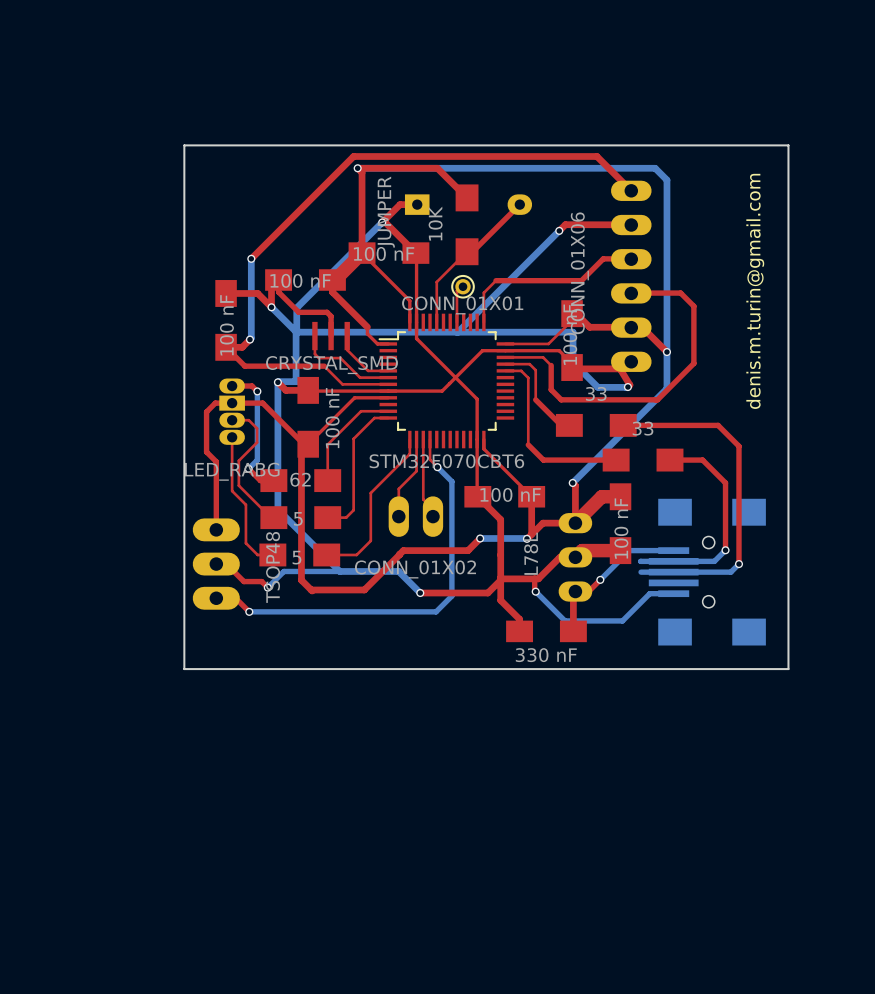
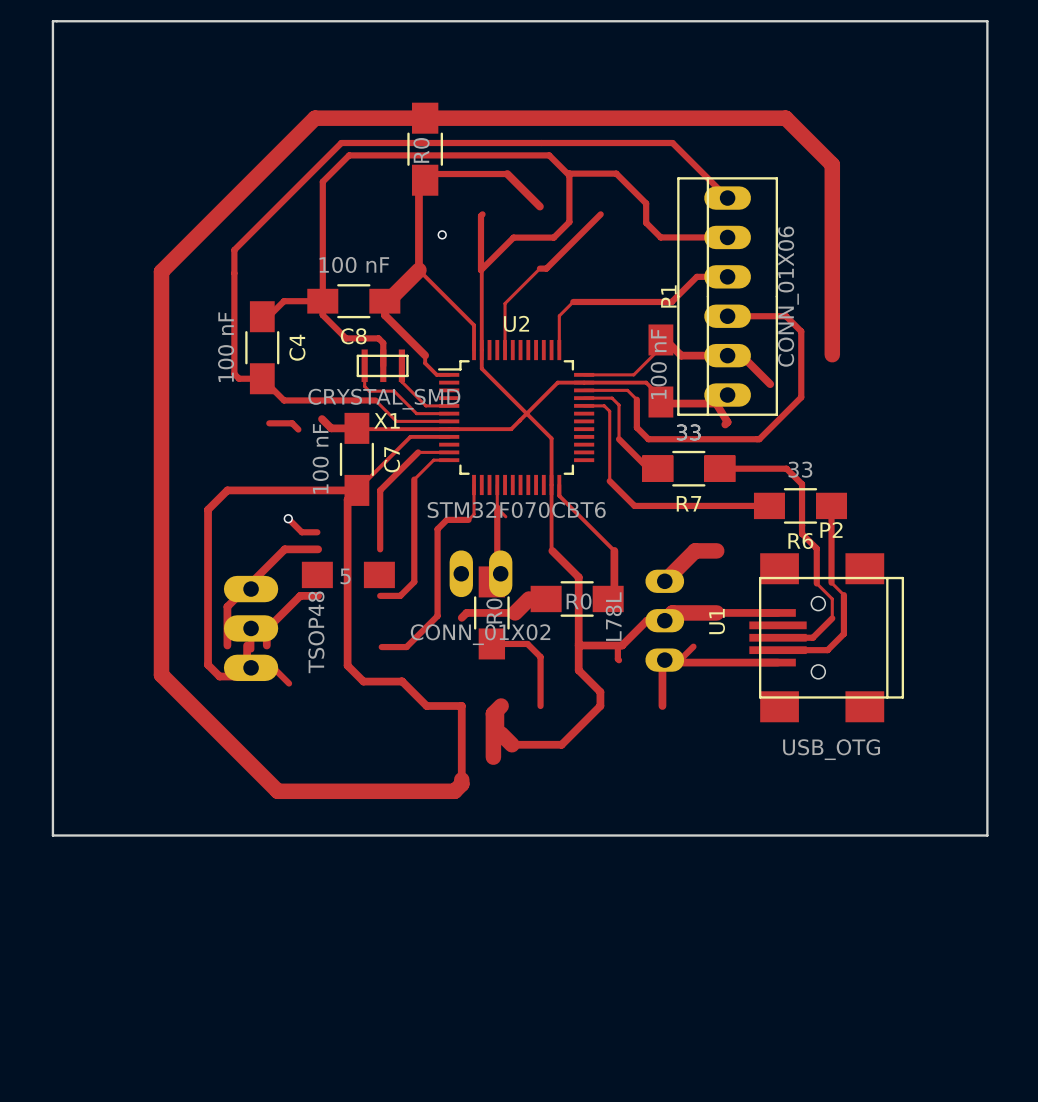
board edge: (184, 145) (184, 669) (788, 669) (788, 145) (184, 145) -> (52, 21) (52, 835) (987, 835) (987, 21) (52, 21)
part: none -> R0 (425, 149)
bottom track: (357, 168) (655, 168) (666, 180) (666, 388) (572, 482) -> none
via: (357, 168) -> none
top track: (438, 169) (357, 168) (362, 172) (362, 184) -> (507, 174) (436, 174) (418, 191)
top track: none -> (569, 175) (549, 155) (349, 155) (322, 181) (322, 312)
top track: (629, 190) (596, 156) (353, 156) (251, 258) -> (727, 198) (672, 143) (341, 143) (234, 250) (234, 374) (239, 378) (262, 378)
top track: (423, 204) (400, 204) (382, 222) (385, 222) (415, 253) -> none
part: JUMPER (468, 204) -> none
top track: none -> (480, 215) (480, 270) (513, 237) (553, 237) (569, 222) (569, 173) (616, 173) (646, 203) (646, 222) (660, 237) (727, 237)
bottom track: (382, 222) (296, 307) (296, 332) -> none
part: 10K (467, 224) -> none
top track: (617, 224) (565, 224) (559, 230) -> none
bottom track: (559, 230) (457, 332) -> none
via: (559, 230) -> none
part: 100 nF (388, 253) -> none
bottom track: (251, 258) (249, 339) -> none
via: (251, 258) -> none
P1: none -> CONN_01X06 (727, 296)
part: CONN_01X06 (631, 276) -> none
top track: (278, 280) (271, 287) (271, 307) (257, 293) (226, 293) -> (322, 301) (284, 301) (268, 316)
part: 100 nF (305, 280) -> none
C8: none -> 100 nF (353, 301)
top track: (463, 284) (456, 290) (456, 322) -> none
part: CONN_01X01 (463, 286) -> none
text: denis.m.turin@gmail.com (755, 291) -> none
U2 name: none -> U2 (516, 323)
bottom track: (271, 307) (296, 331) (296, 381) (277, 382) (277, 509) (339, 571) -> none
via: (271, 307) -> none
part: 100 nF (226, 320) -> none
C4: none -> 100 nF (262, 347)
top track: none -> (832, 354) (832, 164) (785, 118) (315, 118) (161, 271) (161, 674) (277, 791) (454, 791) (461, 784) (461, 705) (426, 705) (401, 681)
bottom track: (296, 332) (573, 332) (573, 362) (597, 387) (627, 387) -> none
X1: none -> CRYSTAL_SMD (382, 365)
part: CRYSTAL_SMD (331, 336) -> none
top track: (249, 339) (242, 347) (226, 347) -> none
via: (249, 339) -> none
via: (666, 352) -> none
top track: (521, 370) (528, 377) (528, 444) (543, 460) (616, 460) -> (602, 405) (609, 411) (609, 481) (634, 505) (769, 505)
via: (277, 382) -> none
via: (627, 387) -> none
bottom track: (257, 391) (257, 460) (248, 468) -> none
via: (257, 391) -> none
part: LED_RABG (232, 411) -> none
top track: (361, 411) (327, 444) (327, 480) -> (418, 452) (380, 490) (380, 549)
part: 100 nF (308, 417) -> none
C7: none -> 100 nF (356, 459)
top track: (374, 418) (353, 438) (353, 510) (346, 517) (327, 517) -> (433, 460) (414, 479) (414, 581) (400, 595) (380, 595)
top track: (232, 420) (248, 420) (257, 428) (257, 442) (238, 460) (238, 485) (270, 517) (273, 517) -> none
R7: none -> 33 (688, 468)
top track: (681, 425) (718, 425) (738, 446) (738, 564) -> (786, 468) (802, 484) (802, 533) (816, 548) (816, 583) (832, 598) (832, 618) (812, 637) (778, 637)
top track: (232, 437) (232, 491) (245, 504) (245, 543) (257, 554) (272, 554) -> none
top track: (416, 439) (416, 471) (398, 488) (398, 516) -> none
top track: (423, 439) (423, 499) (432, 509) (432, 516) -> none
top track: (303, 444) (262, 403) (215, 403) (206, 411) (206, 451) (216, 461) (216, 529) -> (351, 490) (227, 490) (208, 509) (208, 664) (219, 676) (242, 676) (247, 672) (247, 645)
top track: (301, 450) (301, 580) (312, 590) -> (349, 498) (347, 499) (347, 665) (363, 681) (402, 681)
top track: (409, 454) (370, 493) (370, 540) (356, 554) (326, 554) -> (474, 501) (474, 514) (468, 519) (446, 519) (437, 529) (437, 616) (406, 647) (381, 647)
R6: none -> 33 (800, 505)
top track: none -> (831, 505) (831, 582) (843, 595) (843, 633) (827, 650) (778, 650)
top track: none -> (497, 507) (497, 576) (491, 581)
part: 33 (643, 460) -> none
top track: (670, 460) (702, 460) (725, 482) (725, 550) -> none
bottom track: (437, 467) (451, 481) (451, 596) (436, 611) (249, 611) -> none
via: (437, 467) -> none
part: 62 (300, 480) -> none
top track: (572, 482) (575, 485) (575, 523) (542, 523) (526, 538) -> none
via: (572, 482) -> none
top track: none -> (318, 549) (284, 549) (227, 606) (227, 645)
part: 100 nF (504, 496) -> none
part: 100 nF (620, 523) -> none
top track: none -> (318, 595) (300, 595) (266, 629) (266, 645)
top track: (480, 538) (468, 550) (445, 550) -> (546, 598) (529, 598) (515, 612)
bottom track: (480, 538) (526, 538) -> none
via: (480, 538) -> none
part: none -> R0 (577, 598)
via: (526, 538) -> none
part: none -> R0 (491, 612)
top track: none -> (716, 612) (778, 612)
bottom track: (673, 550) (629, 550) (600, 579) -> none
bottom track: (725, 550) (714, 561) (640, 561) -> none
via: (725, 550) -> none
part: 5 (299, 554) -> none
top track: (399, 554) (364, 589) (311, 589) -> none
U1 name: none -> U1 (717, 621)
top track: (226, 564) (243, 581) (261, 581) (267, 587) -> none
bottom track: (738, 564) (730, 572) (641, 572) -> none
via: (738, 564) -> none
top track: none -> (251, 637) (251, 649)
bottom track: (339, 571) (398, 571) (420, 593) -> none
bottom track: (339, 571) (283, 571) (267, 587) -> none
P2 side: bottom (707, 572) -> top (826, 637)
top track: none -> (491, 643) (527, 643) (540, 656) (540, 705)
top track: (502, 578) (487, 593) (420, 593) -> none
via: (600, 579) -> none
via: (267, 587) -> none
bottom track: (535, 591) (564, 620) (622, 620) (649, 593) (673, 593) -> none
via: (535, 591) -> none
via: (420, 593) -> none
top track: none -> (668, 662) (778, 662)
via: (249, 611) -> none
top track: none -> (600, 705) (561, 744) (512, 744) (501, 733) (501, 705) (493, 713) (493, 757)
part: 330 nF (546, 631) -> none

